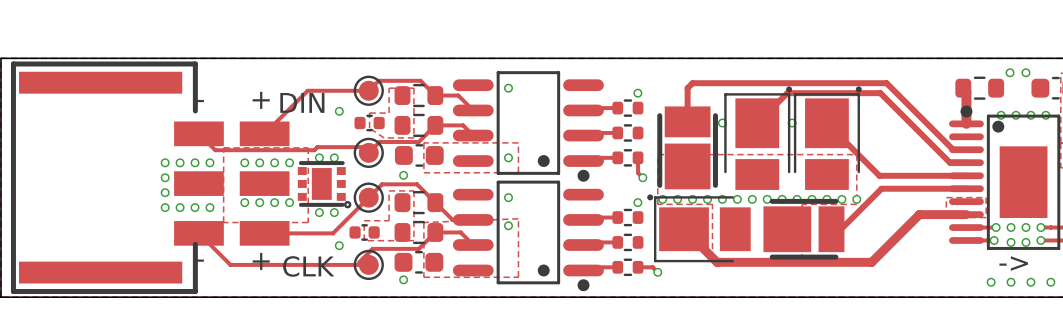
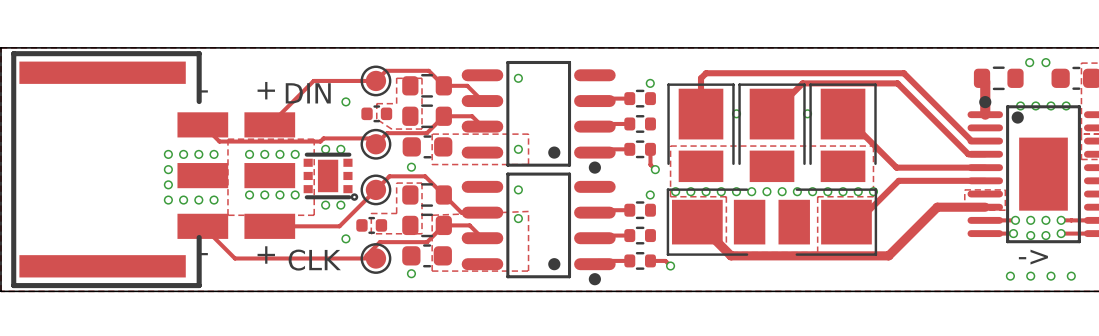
part footprint: [724, 86, 793, 190] -> [738, 83, 806, 183]
part footprint: [793, 86, 862, 190] -> [809, 83, 877, 183]
part footprint: [657, 106, 718, 190] -> [667, 83, 735, 183]
part footprint: [647, 194, 751, 263] -> [666, 188, 766, 256]
part footprint: [763, 198, 845, 260] -> [778, 188, 878, 256]

